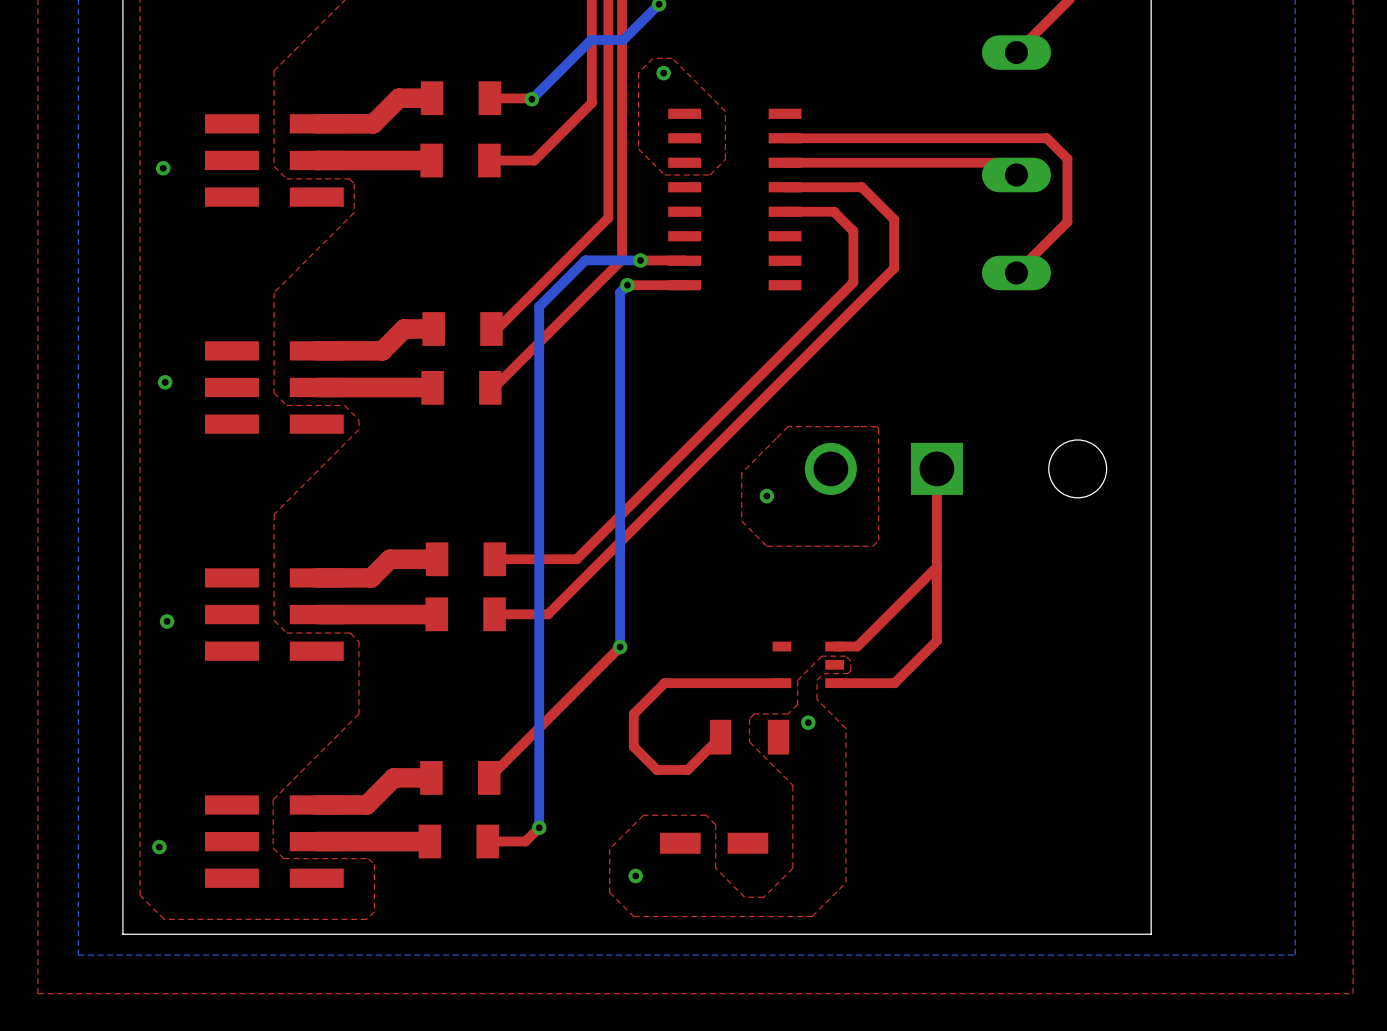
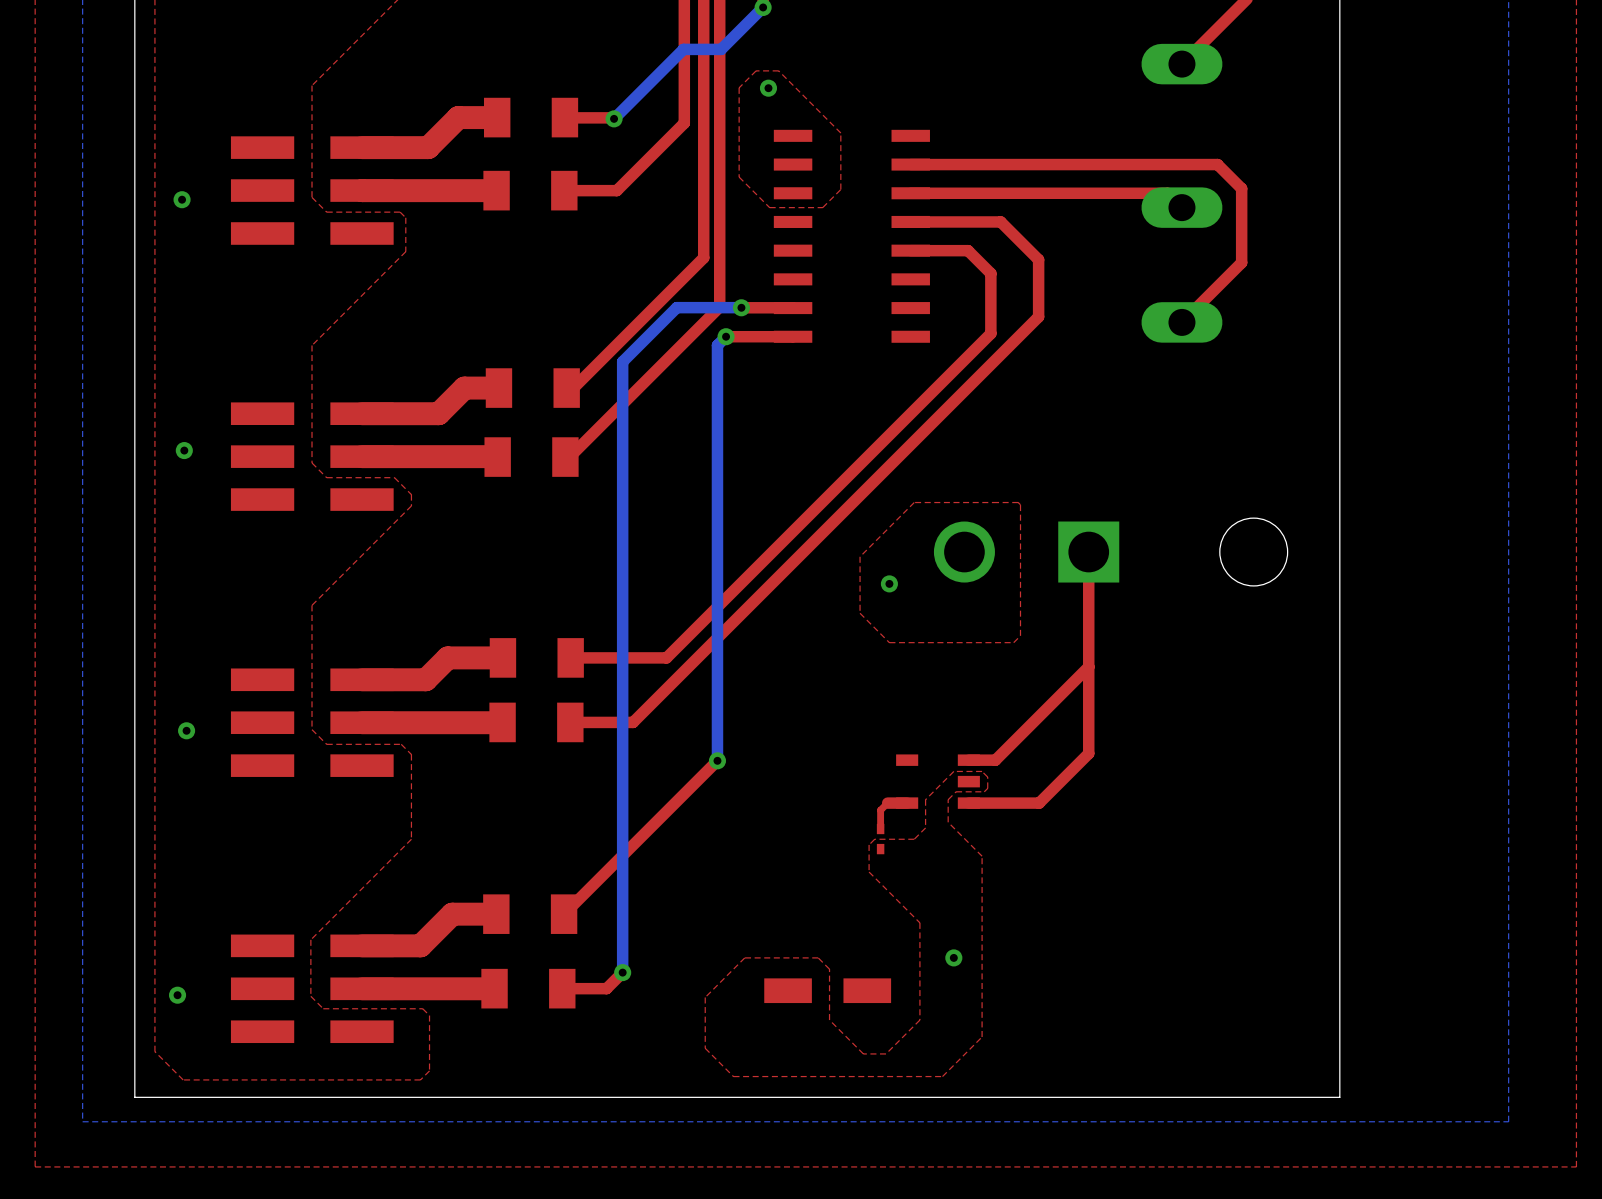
top track: (765, 683) (664, 683) (633, 714) (633, 746) (656, 769) (687, 769) (720, 737) -> (887, 803) (880, 810) (880, 827)
part: none -> (880, 839)
via position: (808, 722) -> (953, 957)
part: (749, 737) -> none
via: (635, 876) -> none

